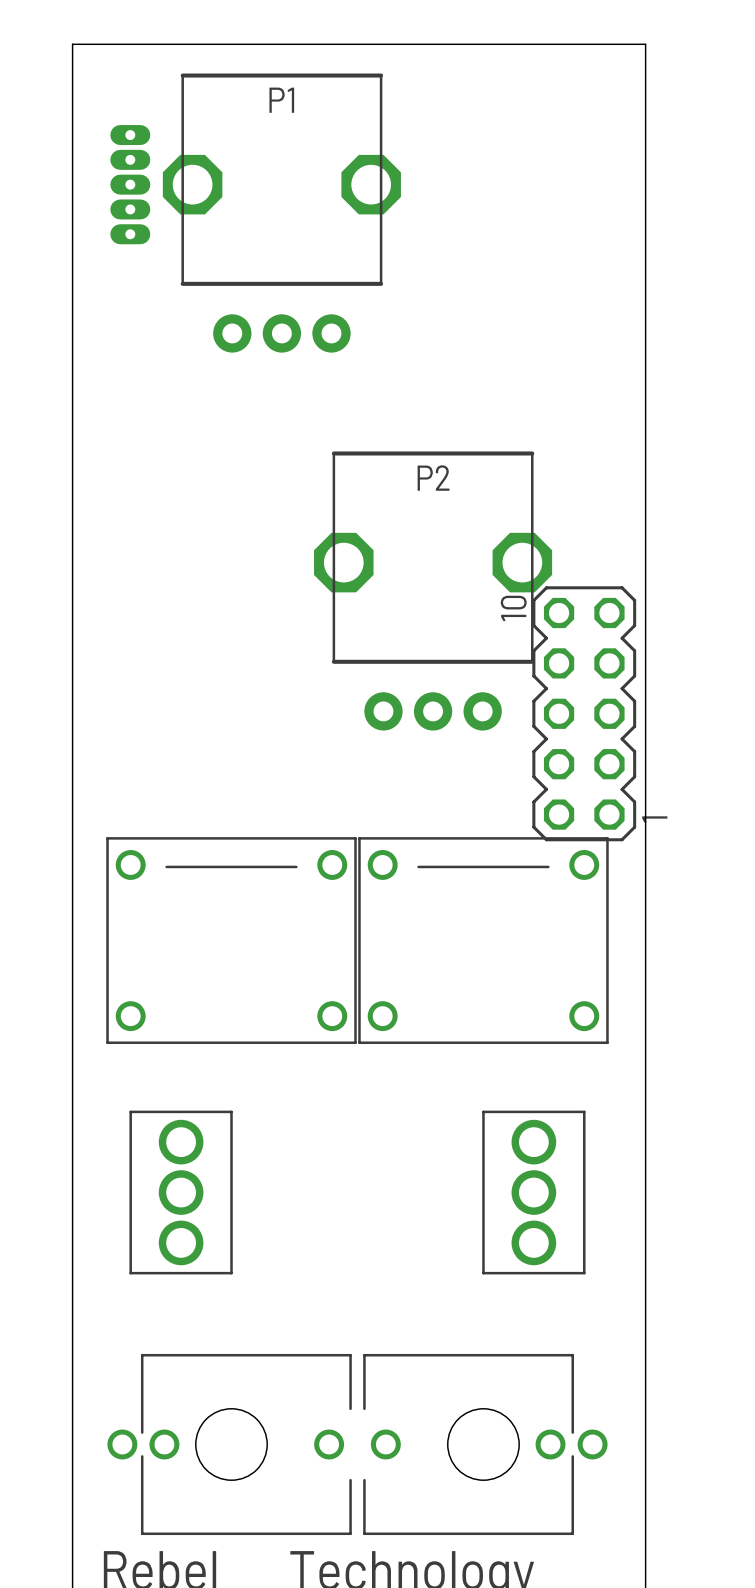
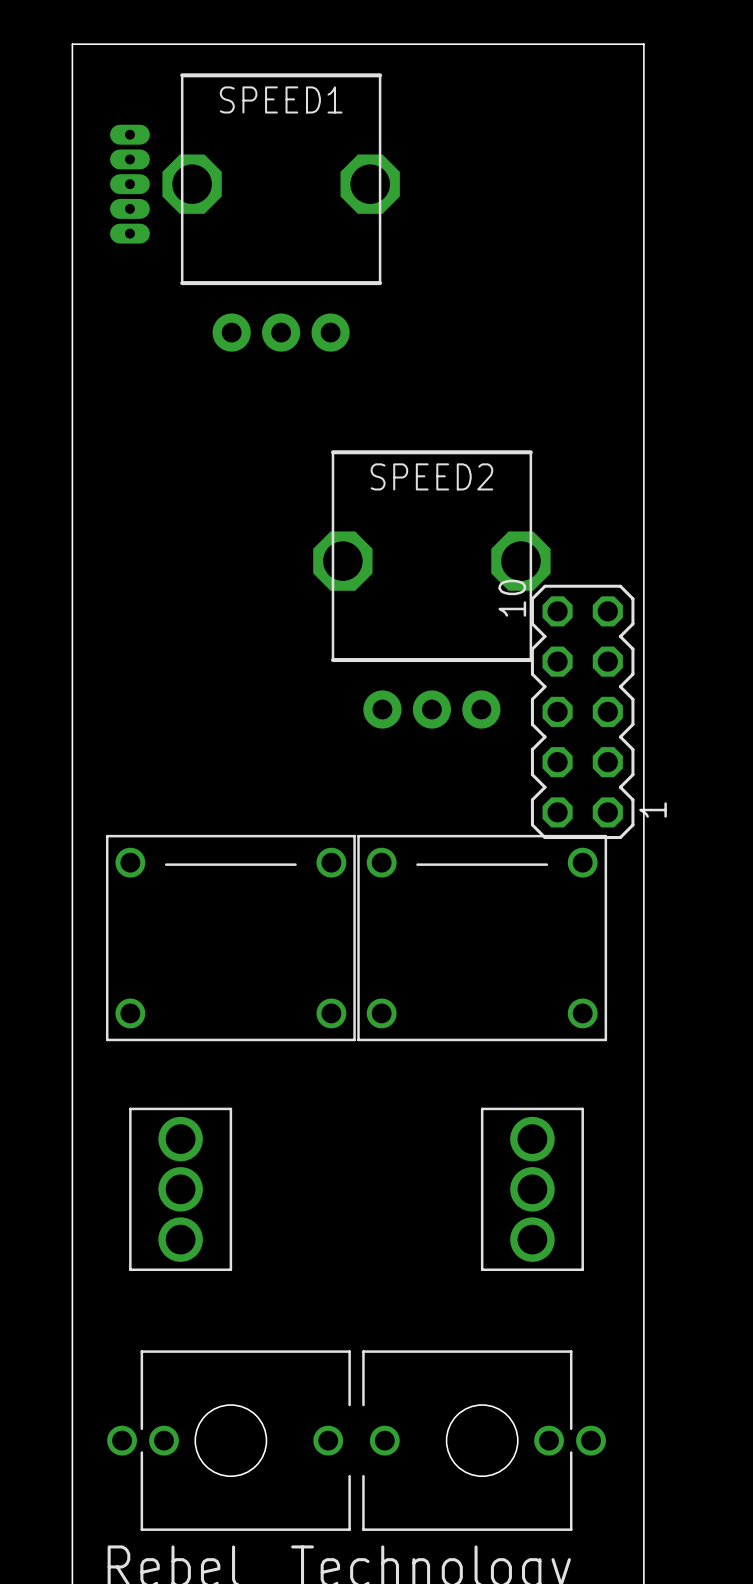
P1 name: P1 (281, 100) -> SPEED1 (281, 99)
P2 name: P2 (433, 478) -> SPEED2 (431, 476)

